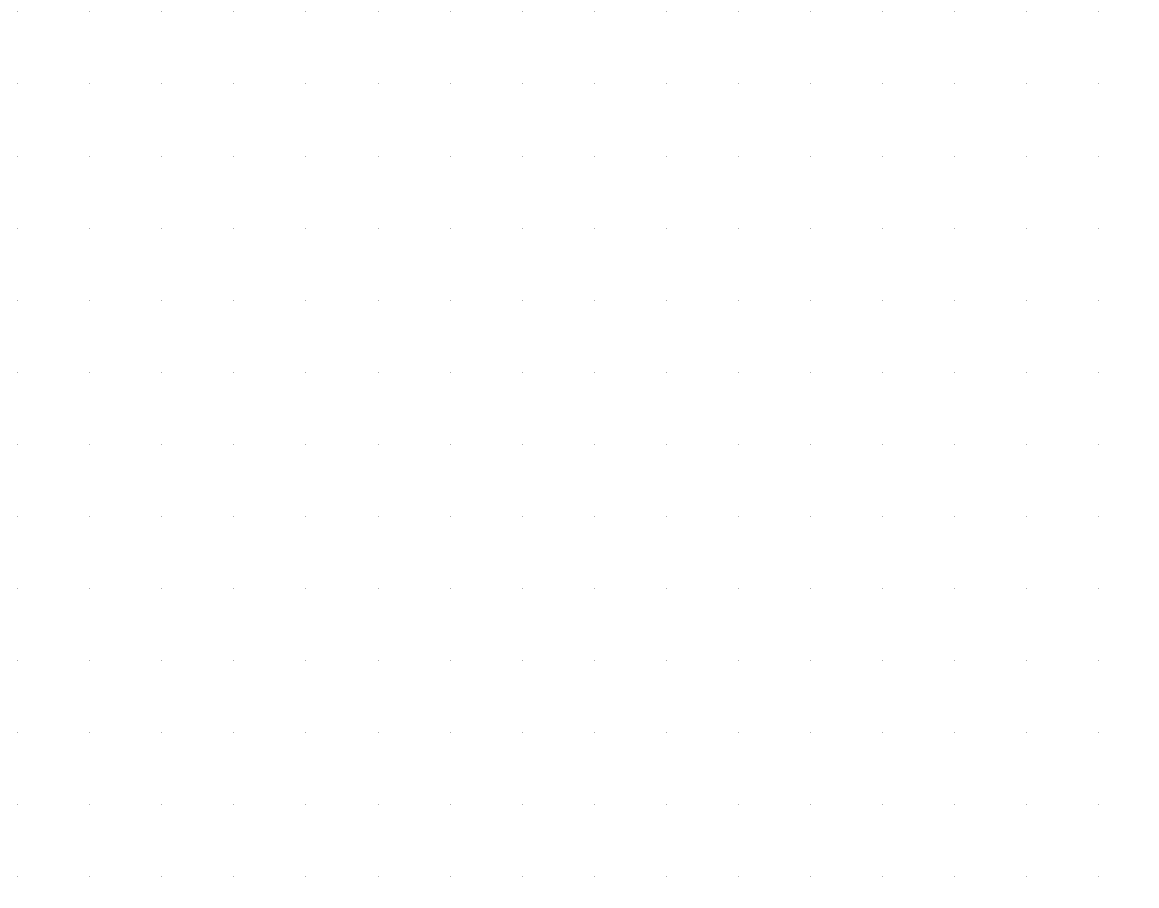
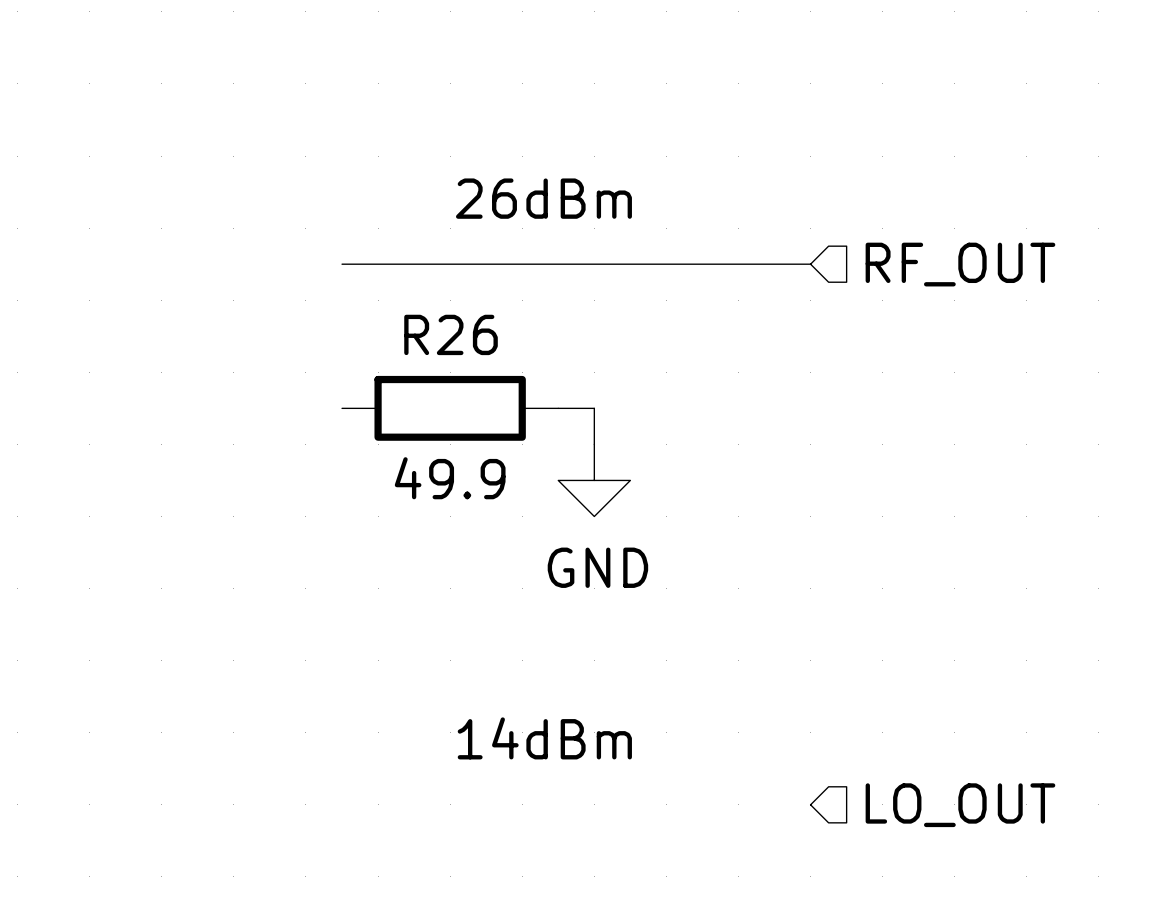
text: none -> 26dBm (543, 198)
wire: none -> (342, 264) (810, 264)
hierarchical label: none -> RF_OUT (960, 264)
R26: none -> 49.9 (450, 408)
wire: none -> (558, 408) (594, 408) (594, 444)
power symbol: none -> GND (594, 480)
text: none -> 14dBm (544, 738)
hierarchical label: none -> LO_OUT (960, 805)

